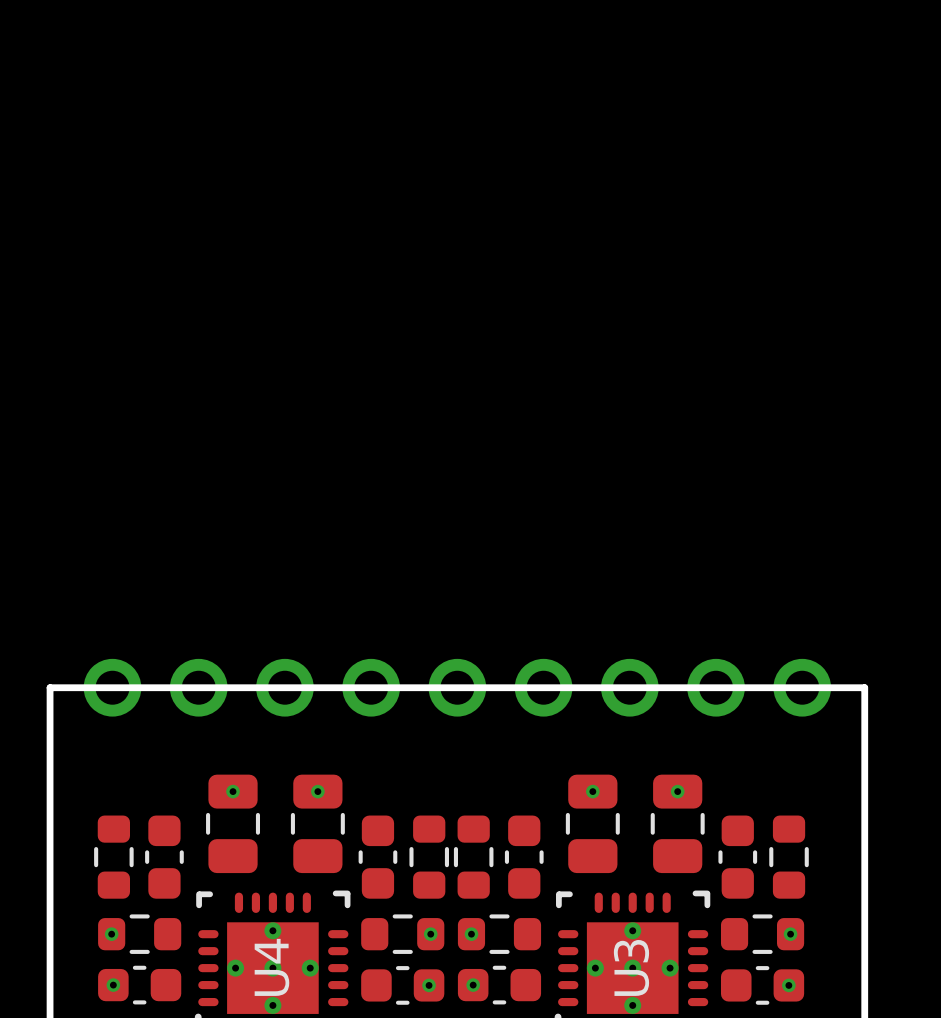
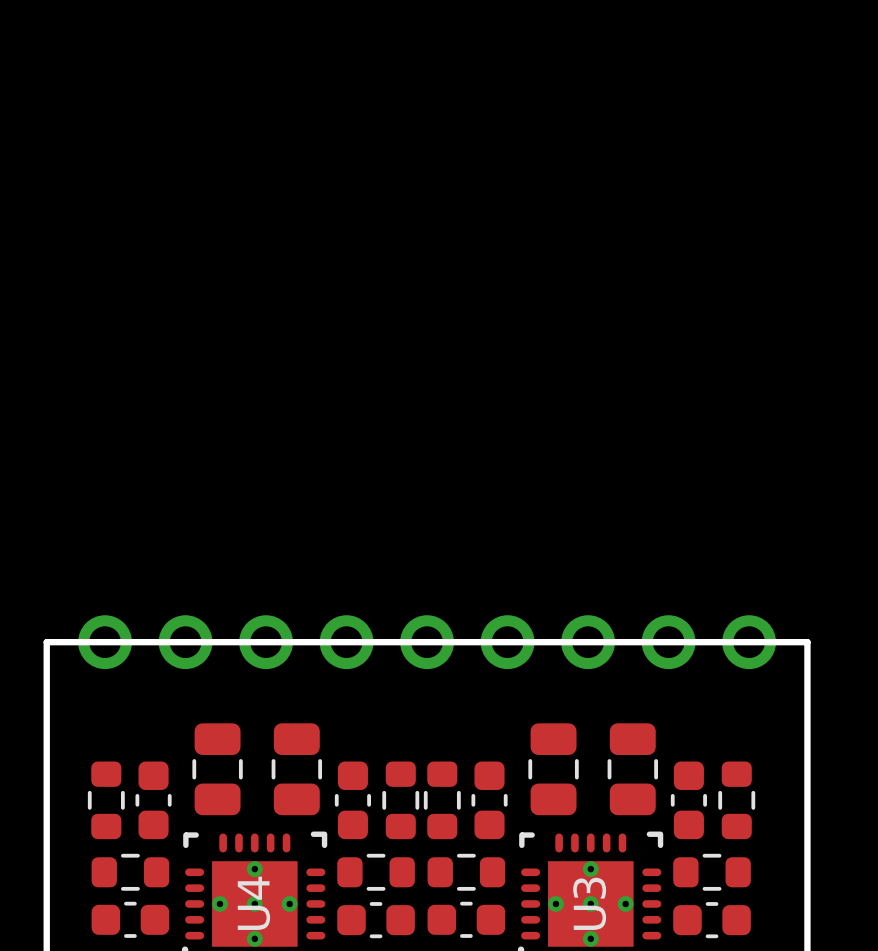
via: (233, 791) -> none
via: (317, 791) -> none
via: (592, 791) -> none
via: (677, 791) -> none
via: (111, 934) -> none
via: (430, 934) -> none
via: (471, 934) -> none
via: (790, 934) -> none
via: (113, 985) -> none
via: (429, 985) -> none
via: (473, 985) -> none
via: (788, 985) -> none

